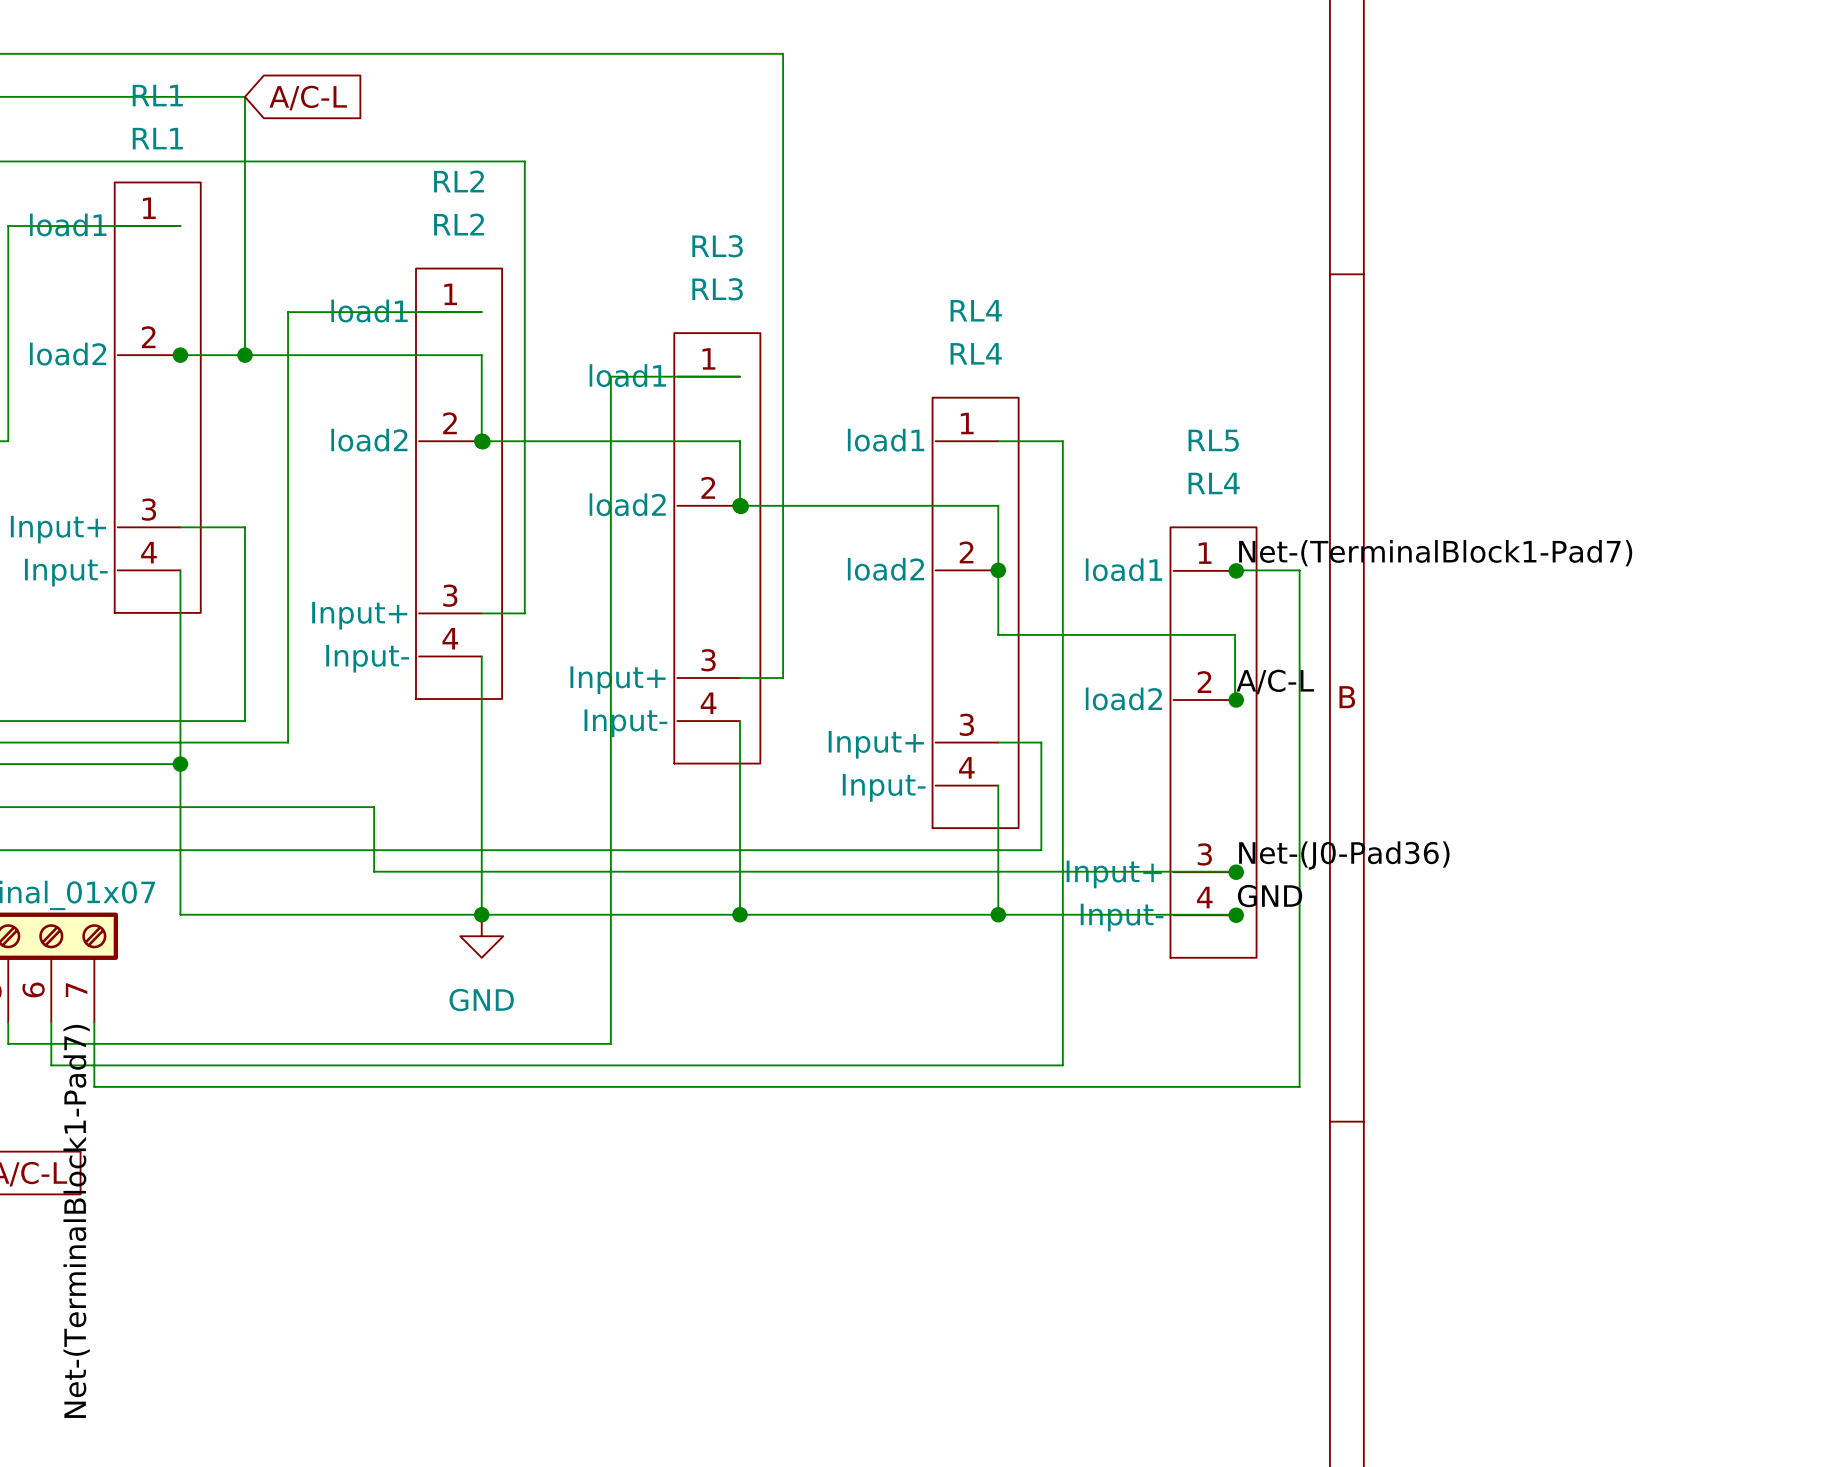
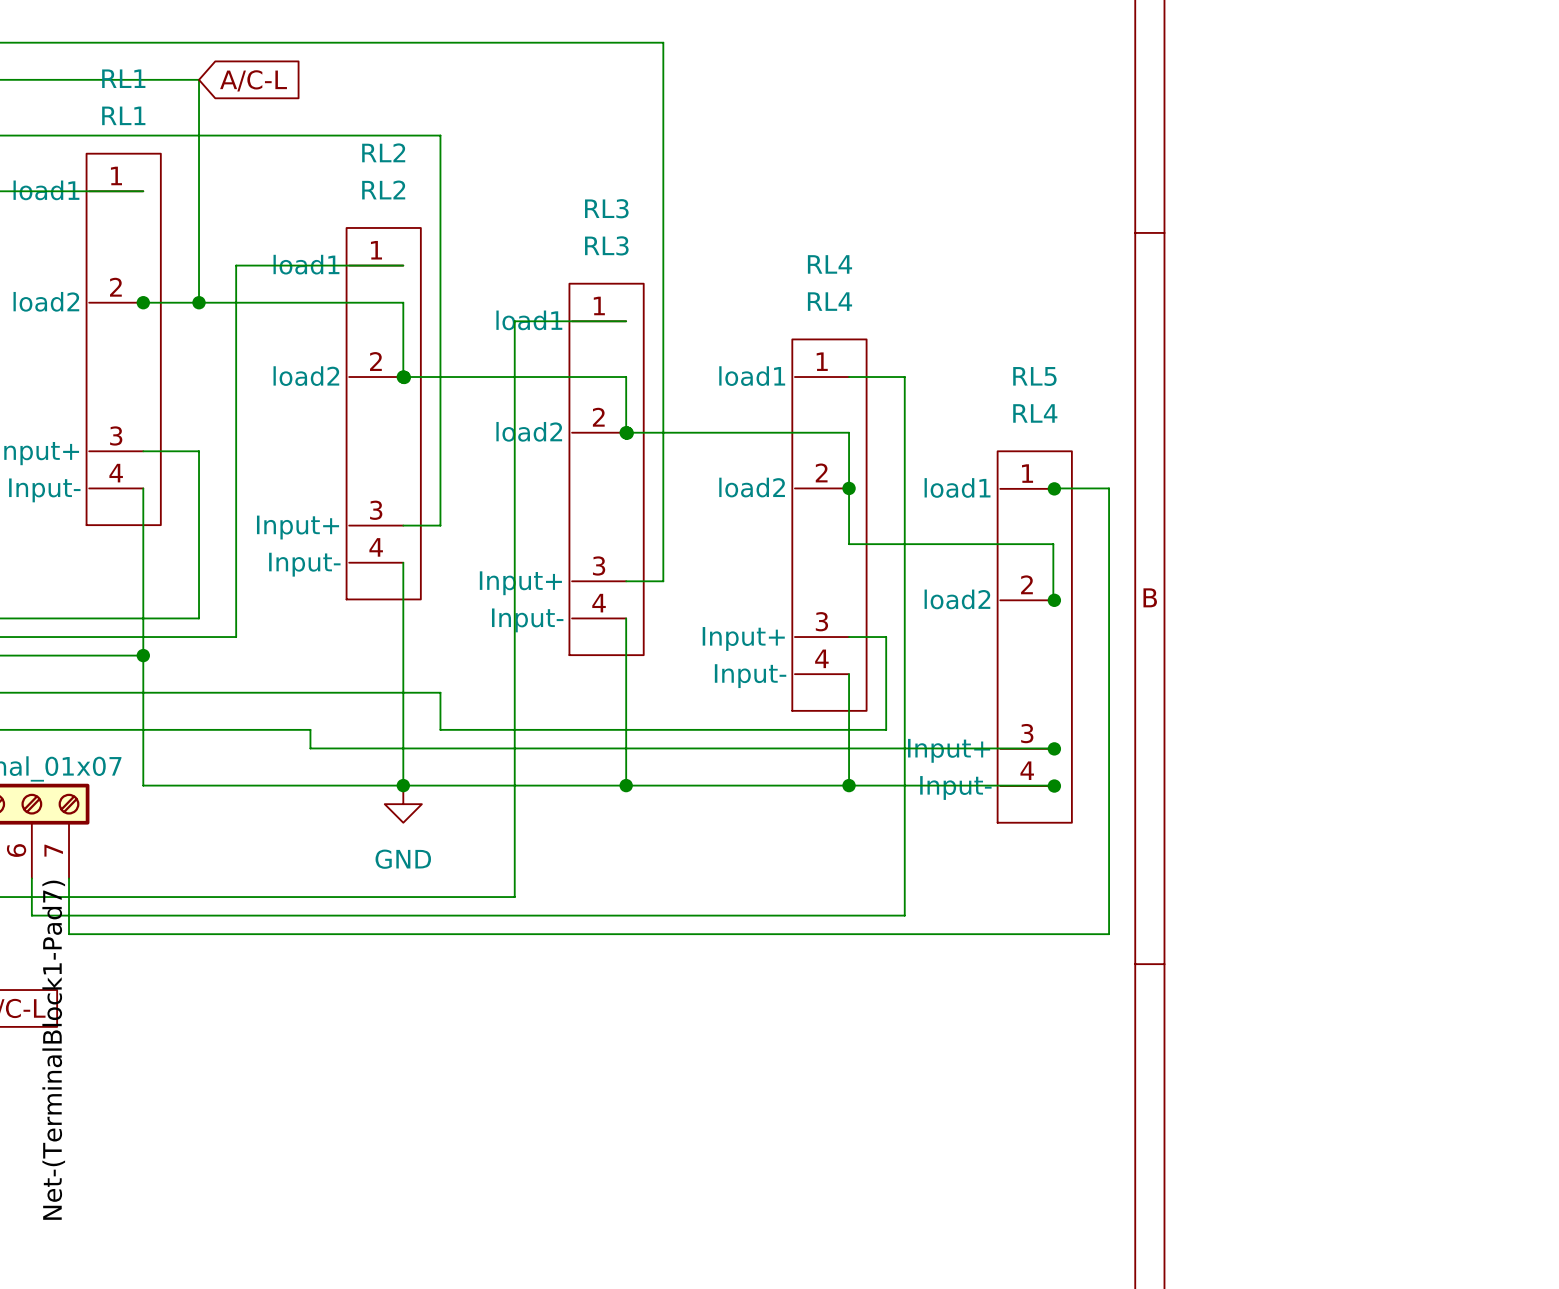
label: Net-(TerminalBlock1-Pad7) (1435, 553) -> none
label: A/C-L (1275, 681) -> none
wire: (374, 807) (374, 850) (524, 850) -> (310, 692) (440, 692) (440, 729)
label: Net-(J0-Pad36) (1344, 855) -> none
label: GND (1270, 896) -> none

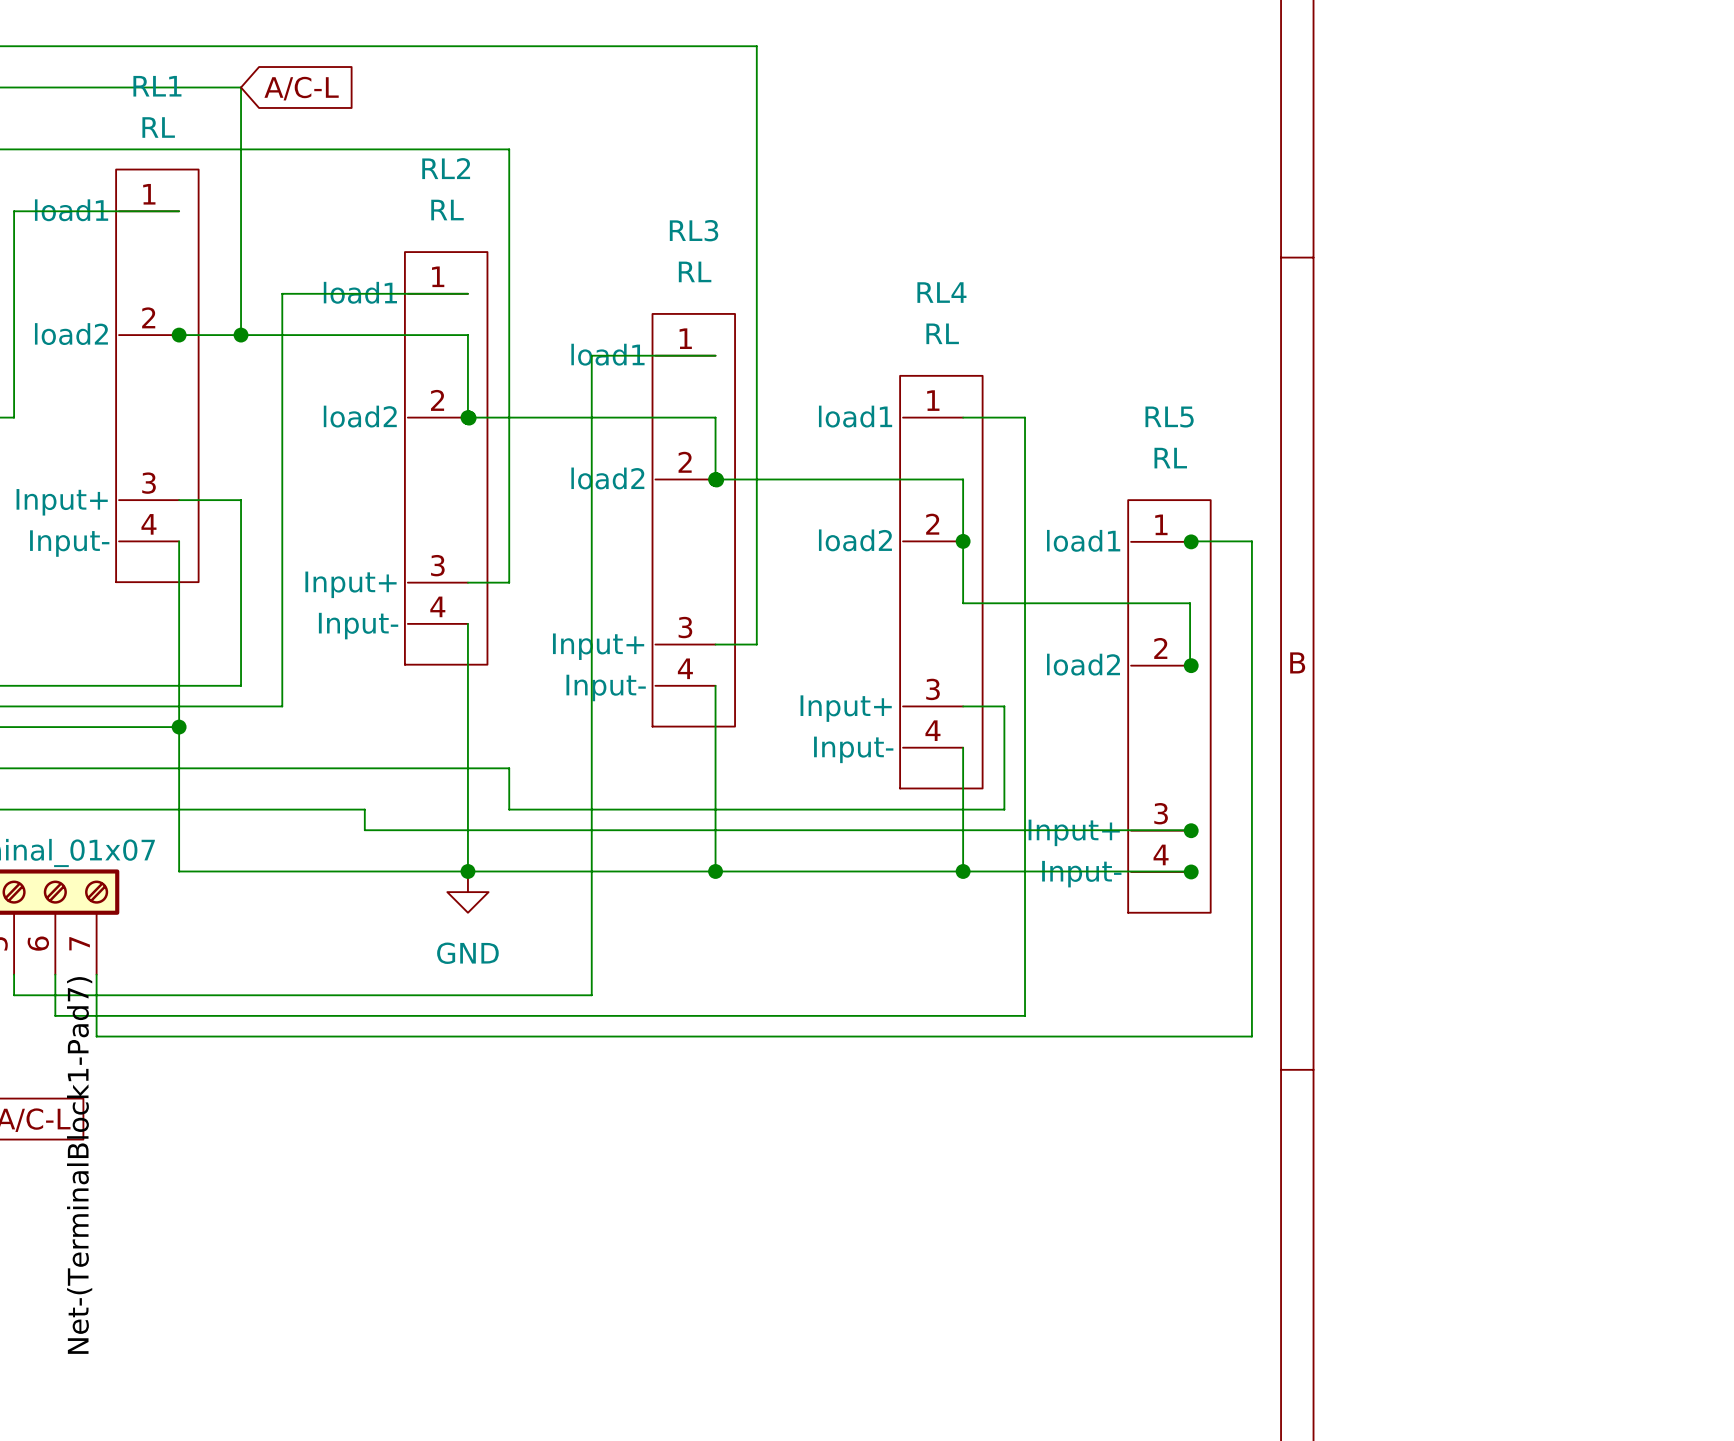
RL1 value: RL1 (123, 115) -> RL (158, 127)
RL2 value: RL2 (383, 189) -> RL (447, 210)
RL3 value: RL3 (606, 245) -> RL (695, 271)
RL4 value: RL4 (829, 301) -> RL (942, 333)
RL5 value: RL4 (1035, 413) -> RL (1170, 458)

